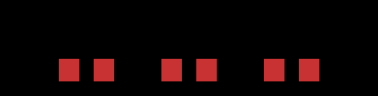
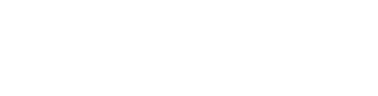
part: (86, 70) -> none
part: (189, 70) -> none
part: (291, 70) -> none

